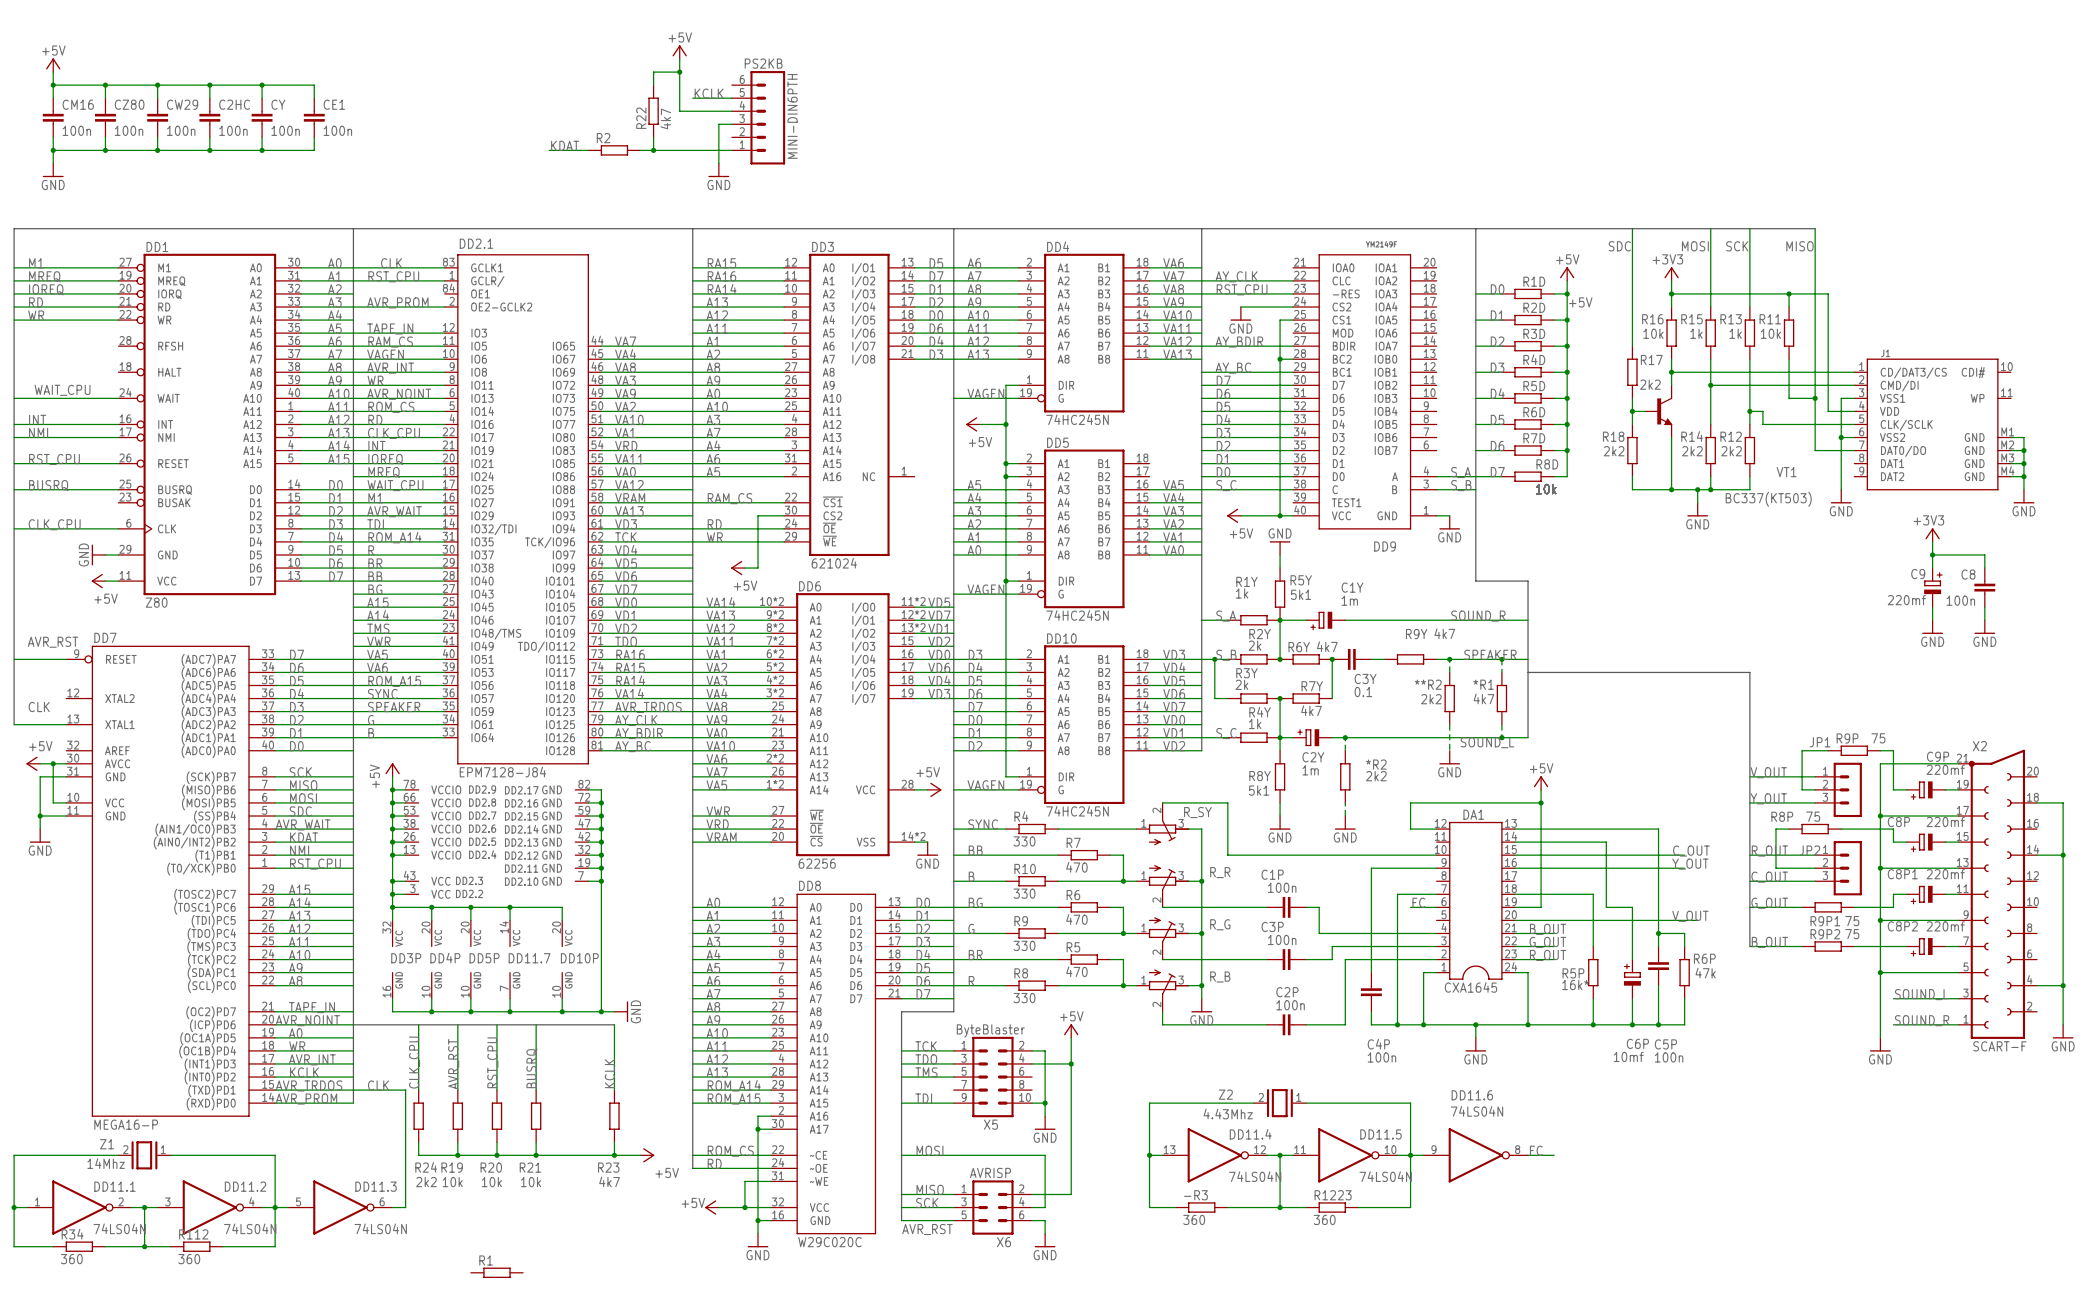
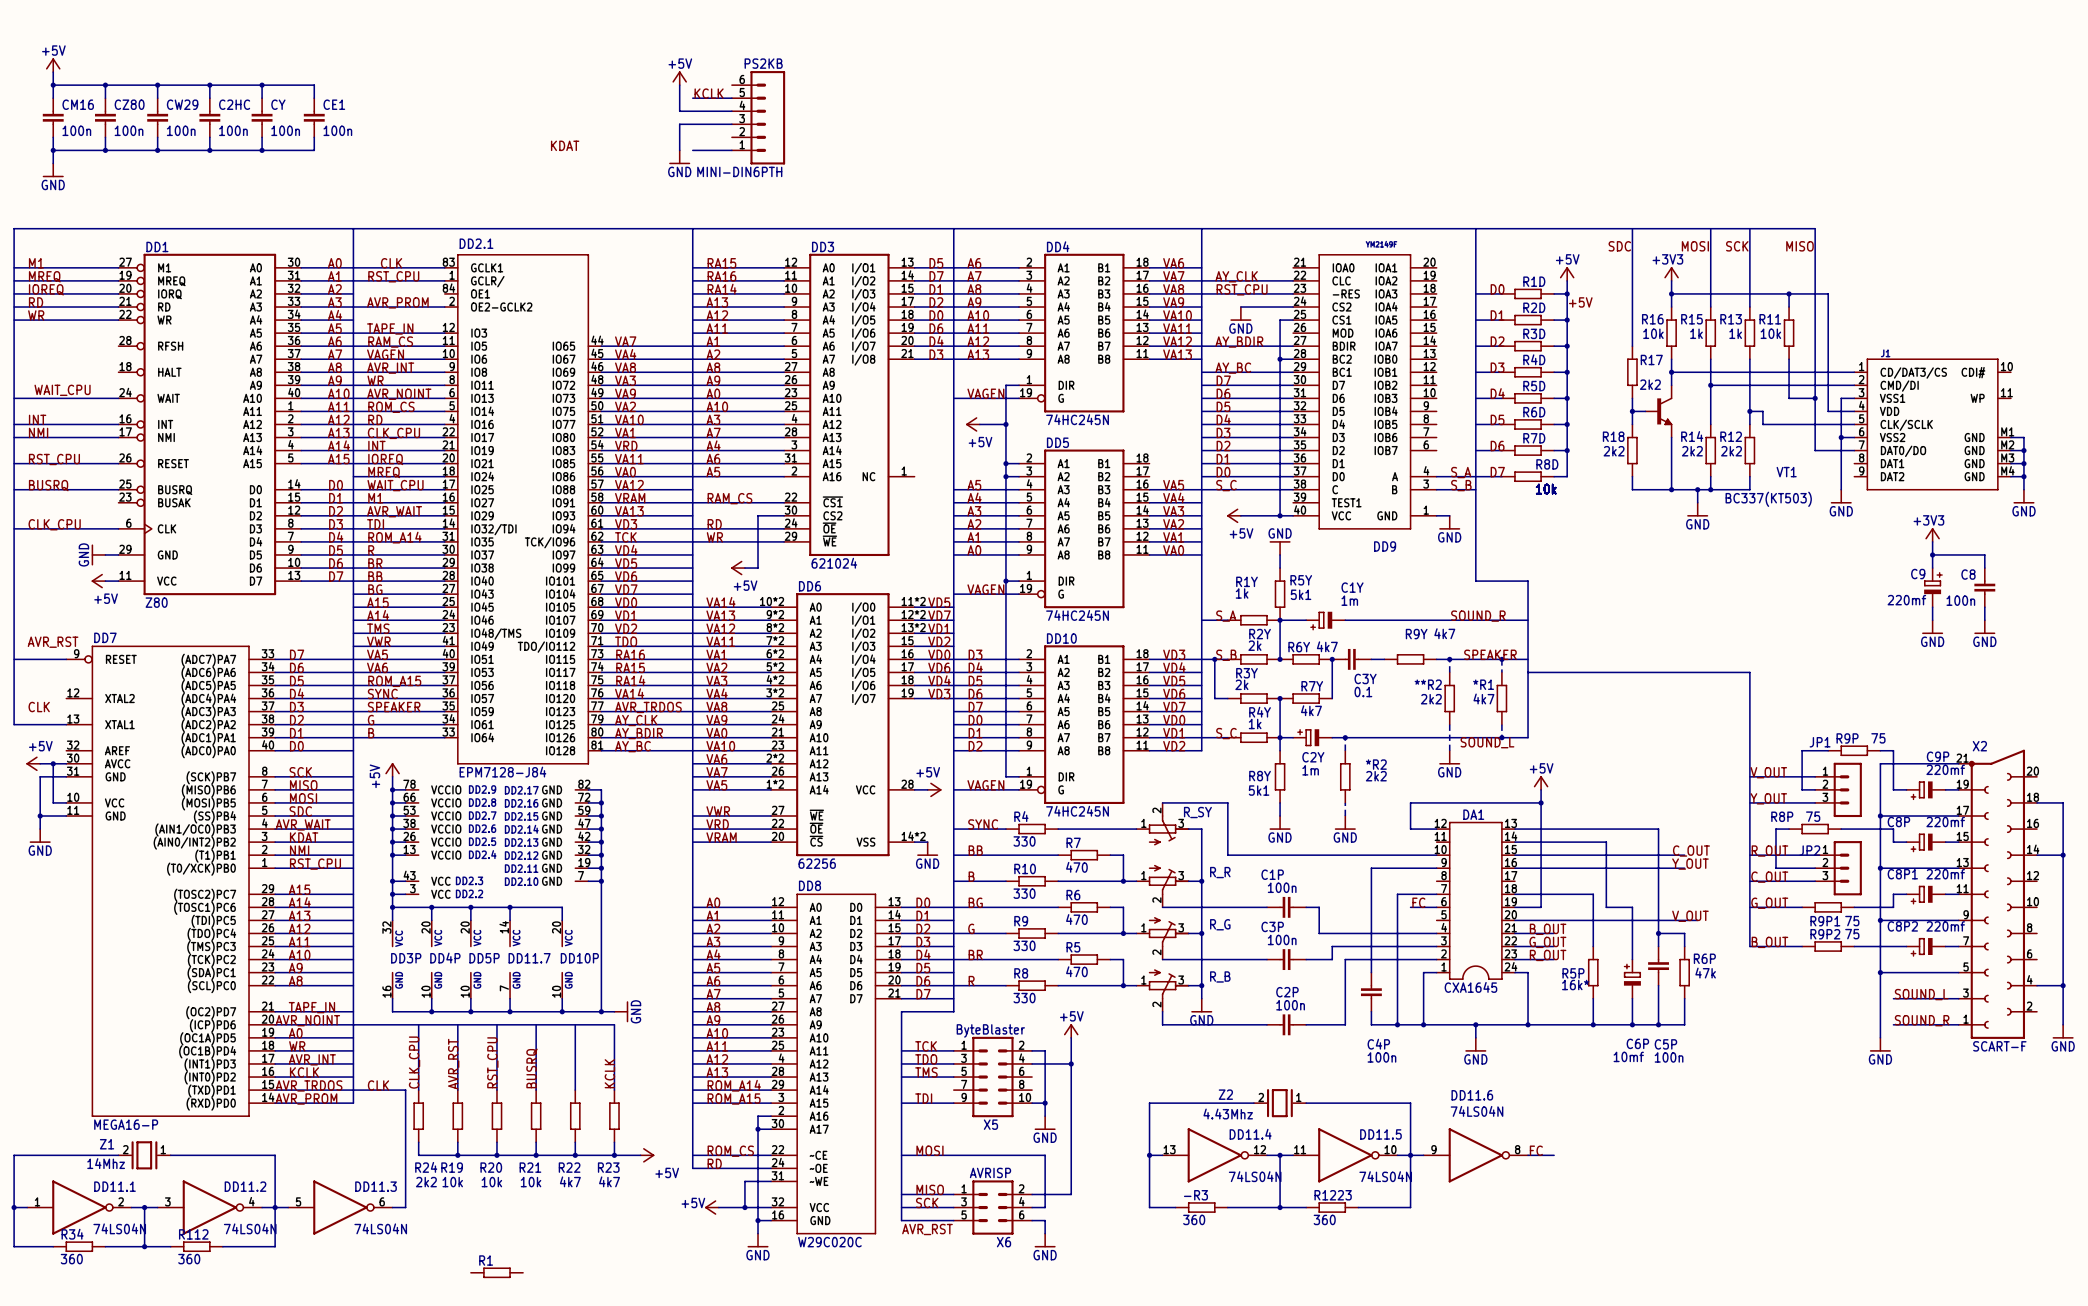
power symbol position: +5V (679, 52) -> +5V (679, 78)
wire: (679, 72) (653, 72) (653, 85) -> none
junction: (679, 72) -> none
R22 position: (653, 111) -> (575, 1116)
PS2KB value rotation: 0° (792, 116) -> 90° clockwise (739, 171)
R22 name rotation: 0° (641, 118) -> 90° clockwise (569, 1167)
R22 name position: R22 (641, 118) -> R22 (569, 1167)
R22 value rotation: 0° (665, 118) -> 90° clockwise (570, 1181)
R22 value position: 4k7 (665, 118) -> 4k7 (570, 1181)
wire: (718, 124) (718, 163) -> (718, 124) (679, 124) (679, 150)
wire: (653, 137) (653, 150) -> none
wire: (549, 150) (588, 150) -> none
R2: (614, 150) -> none
wire: (640, 150) (692, 150) -> none
junction: (653, 150) -> none
power symbol position: GND (718, 170) -> GND (679, 157)
wire: none -> (575, 1024) (575, 1090)
wire: none -> (575, 1142) (575, 1155)
junction: none -> (575, 1155)

